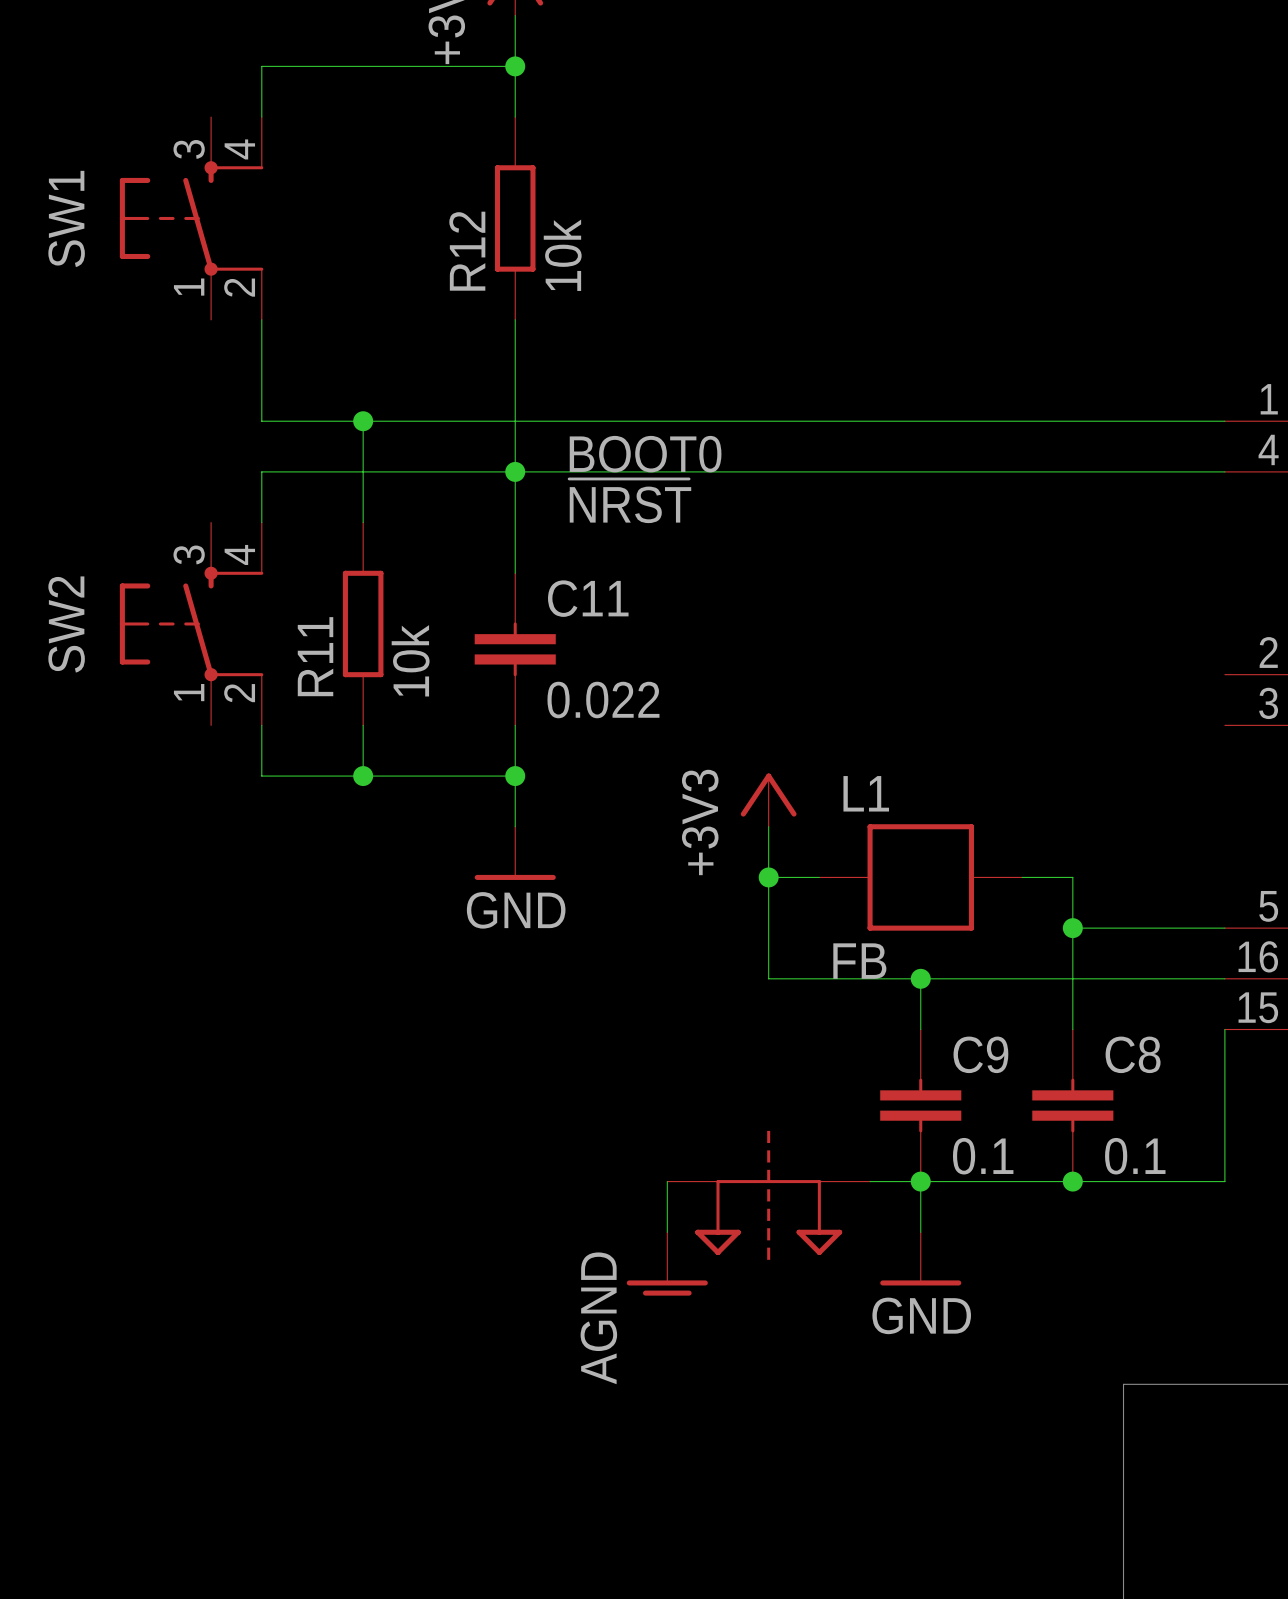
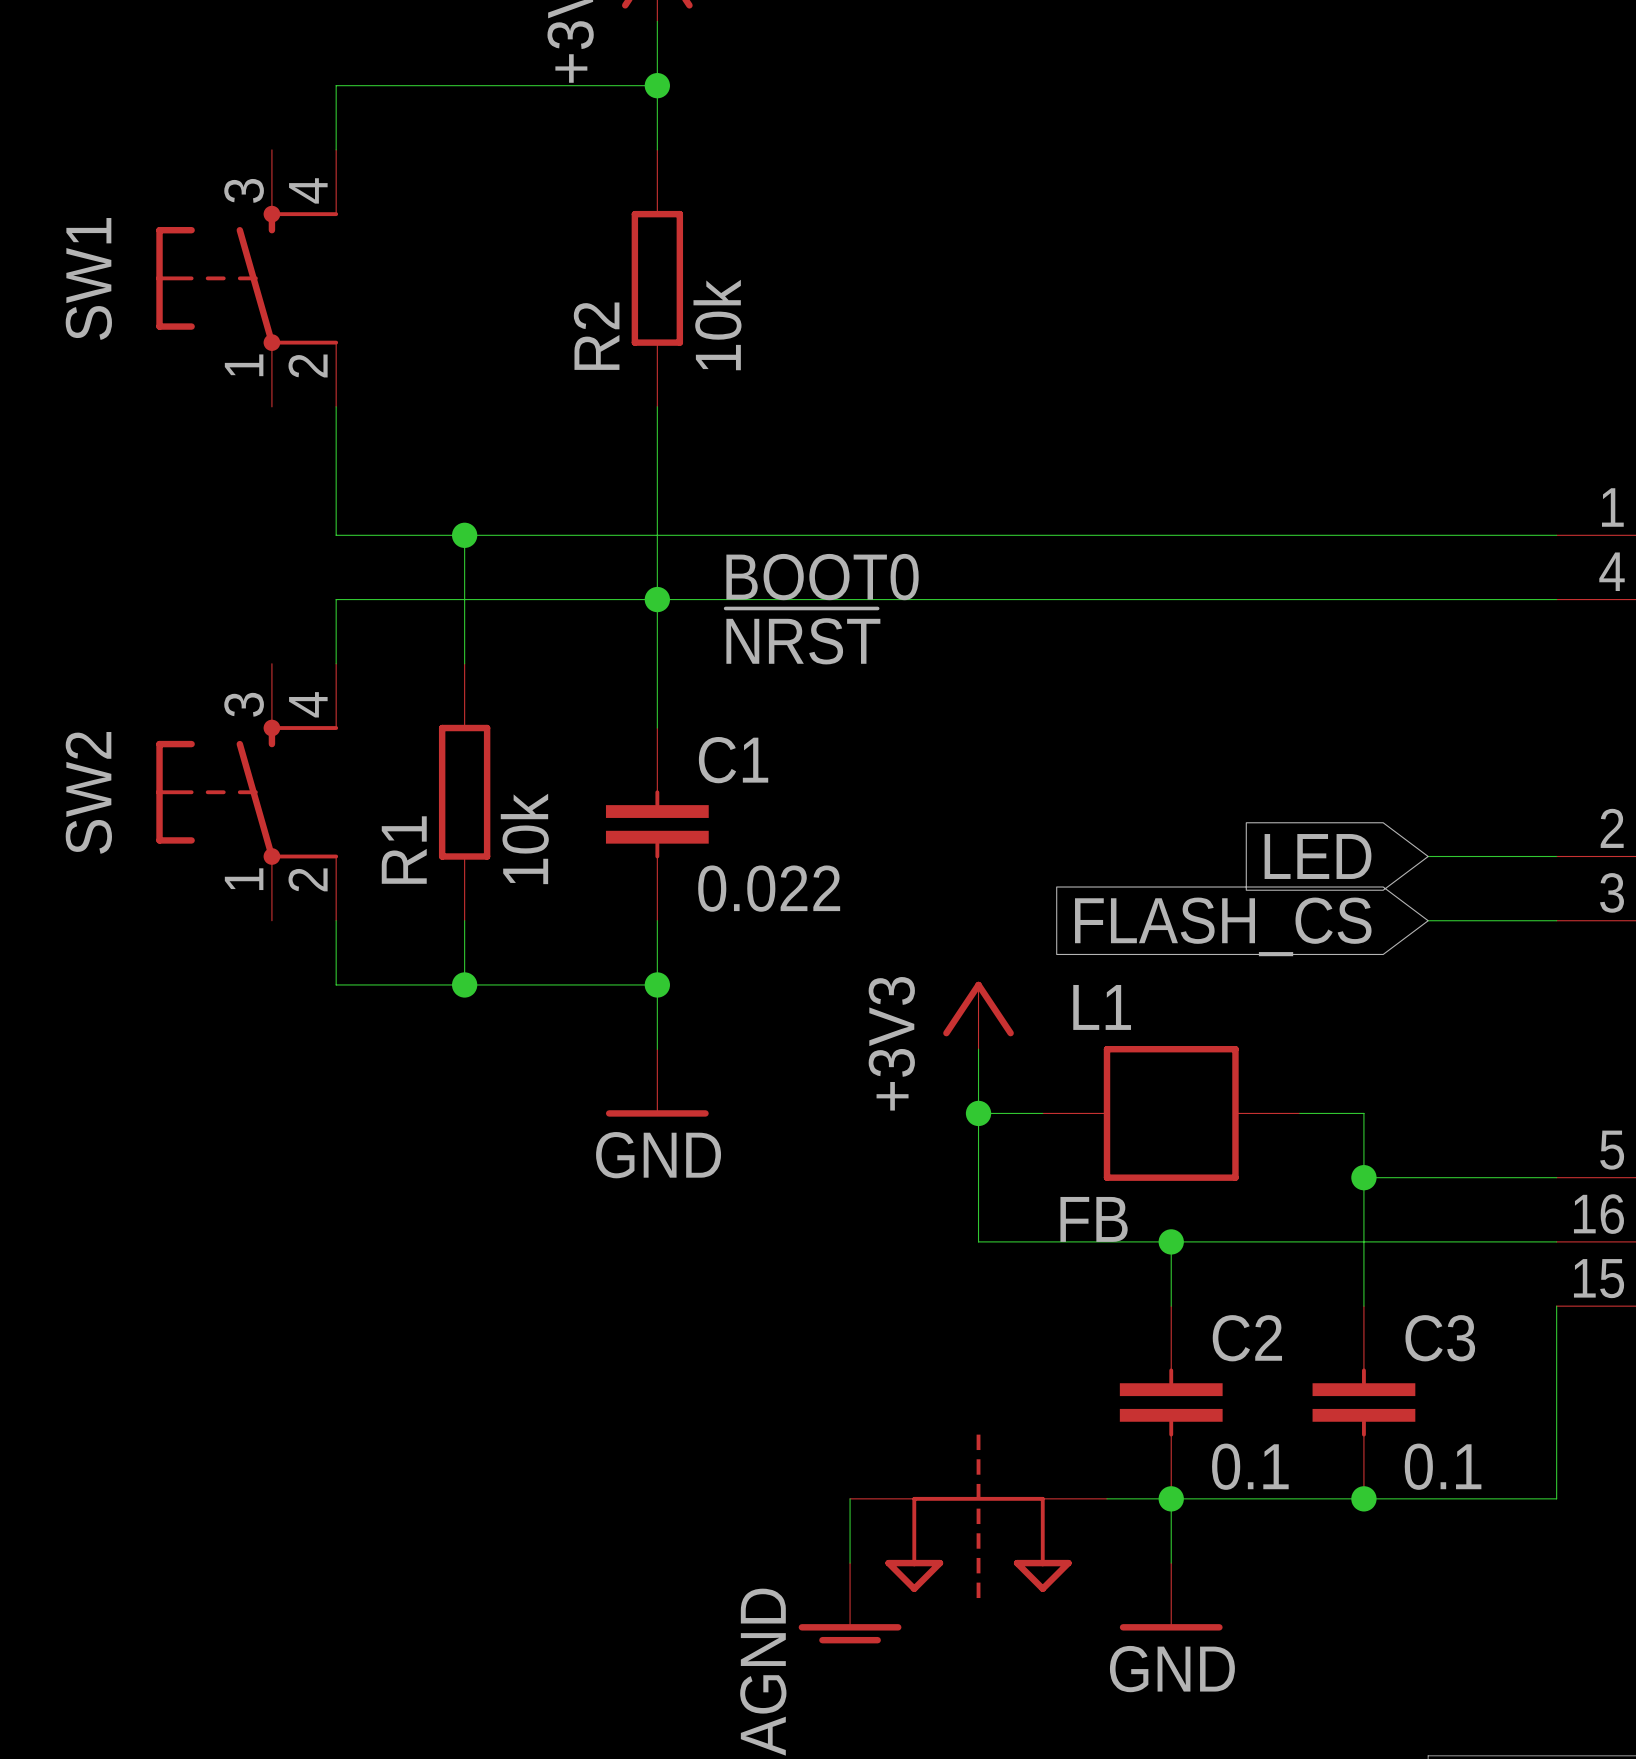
R12 name: R12 (467, 251) -> R2 (596, 336)
C11 name: C11 (588, 598) -> C1 (733, 760)
R11 name: R11 (315, 656) -> R1 (404, 850)
global label: none -> LED (1318, 856)
wire: none -> (1428, 856) (1556, 856)
wire: none -> (1428, 920) (1556, 920)
global label: none -> FLASH_CS (1223, 926)
C9 name: C9 (980, 1054) -> C2 (1247, 1338)
C8 name: C8 (1133, 1054) -> C3 (1440, 1338)

